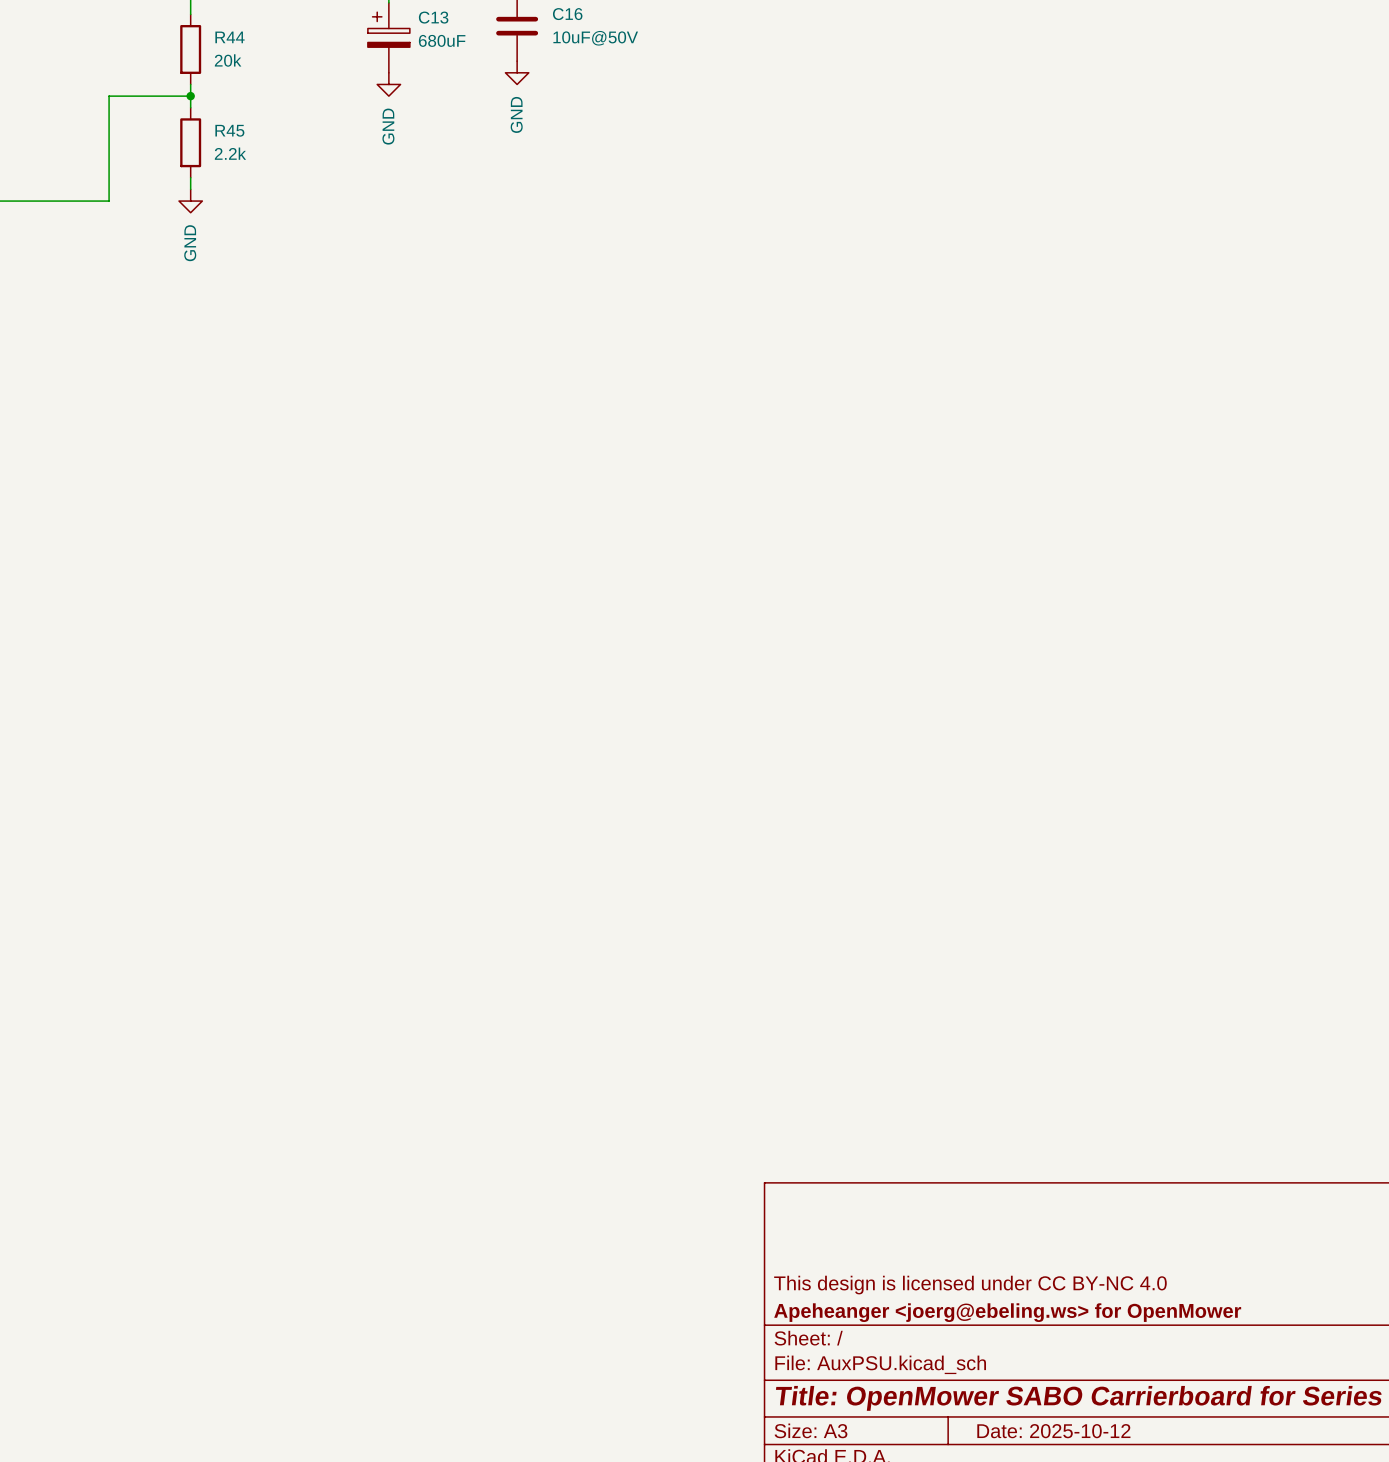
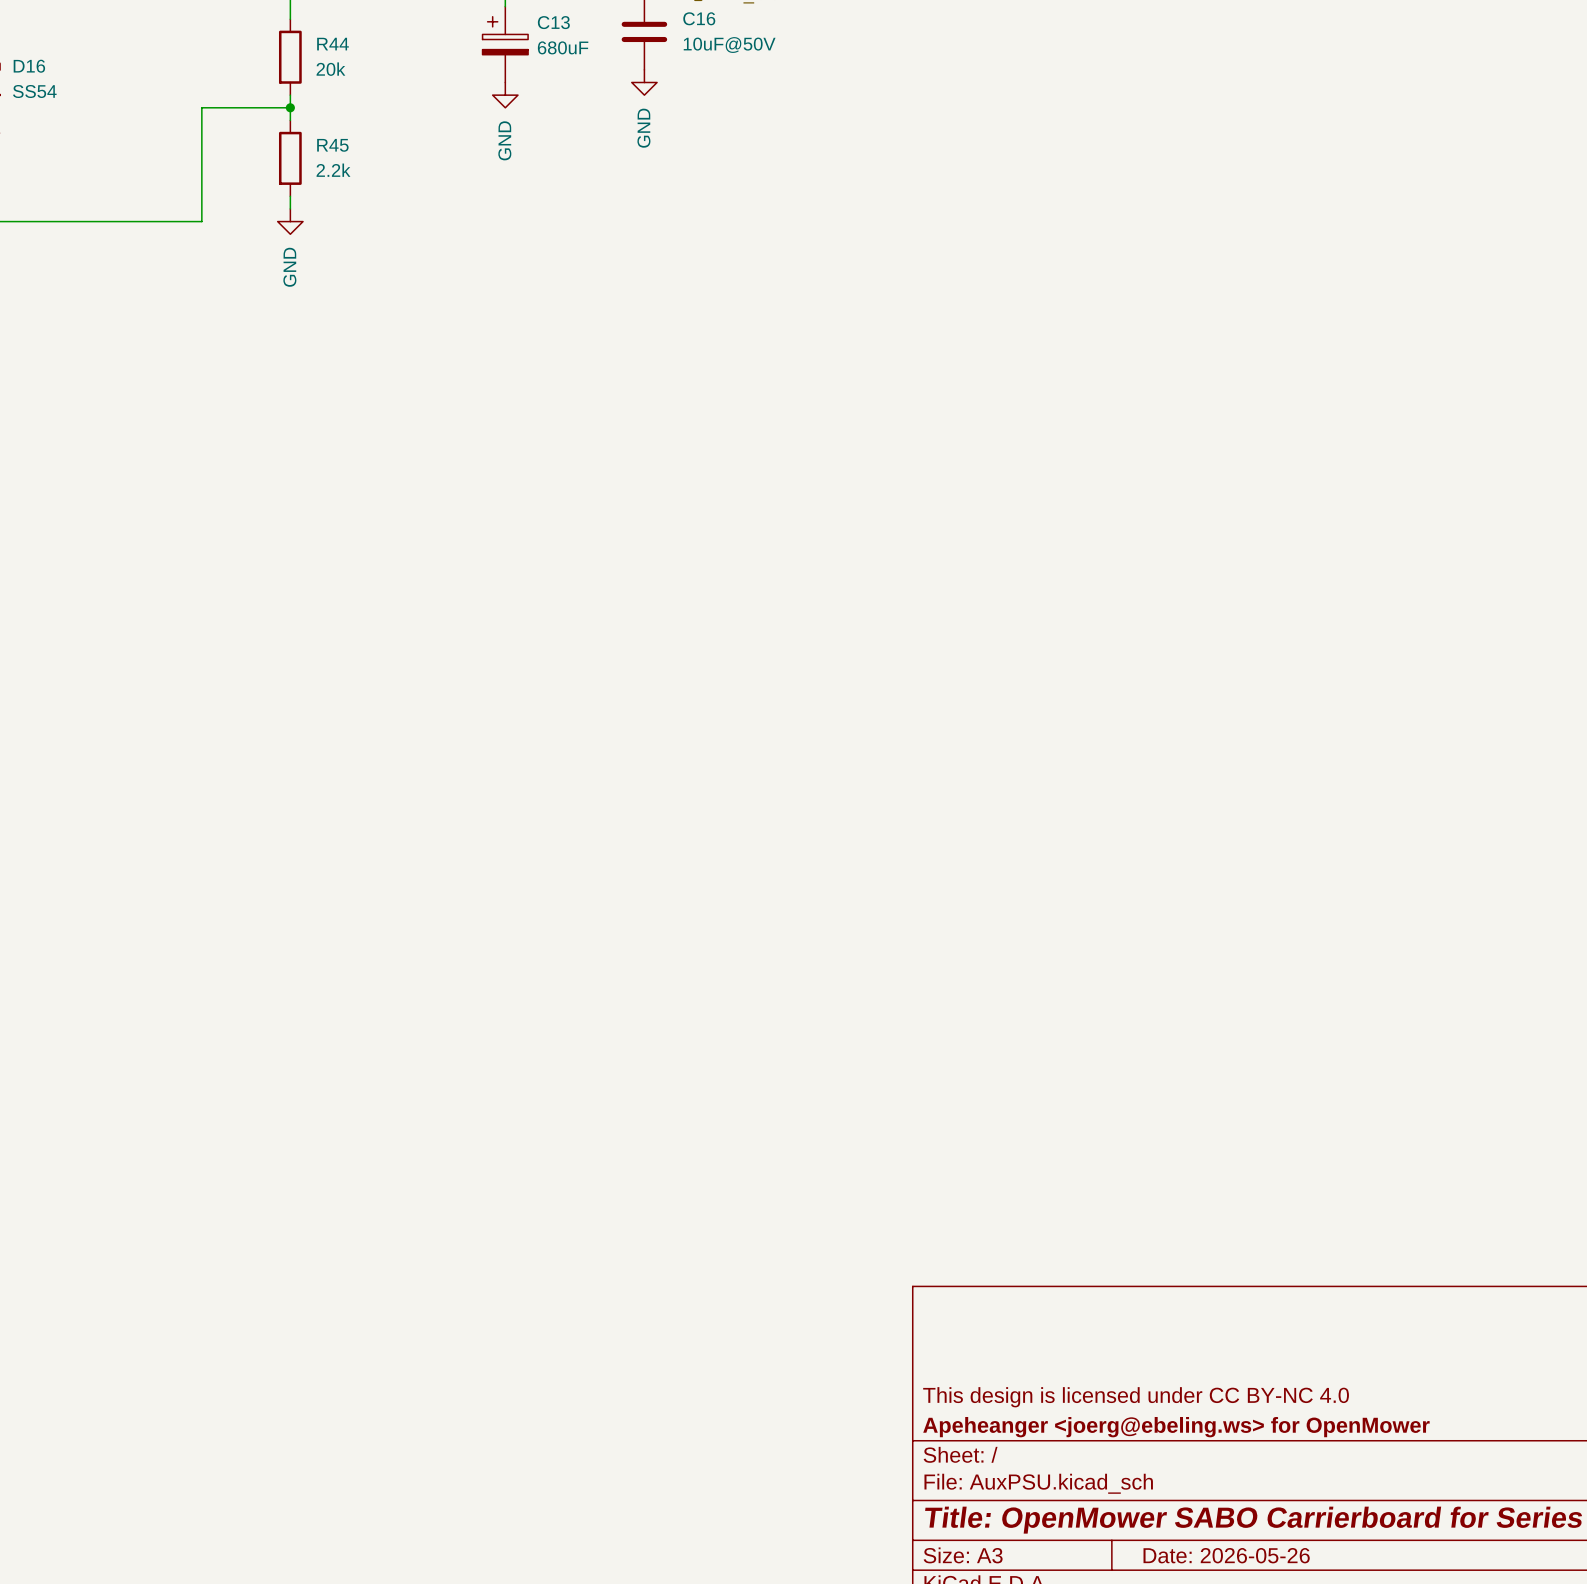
title block: Date: 2025-10-12 (1053, 1431) -> Date: 2026-05-26 (1226, 1555)

